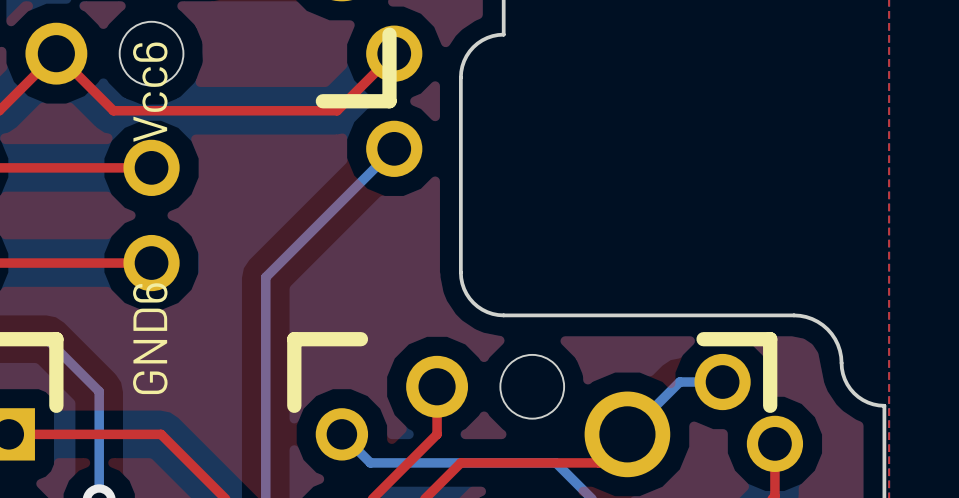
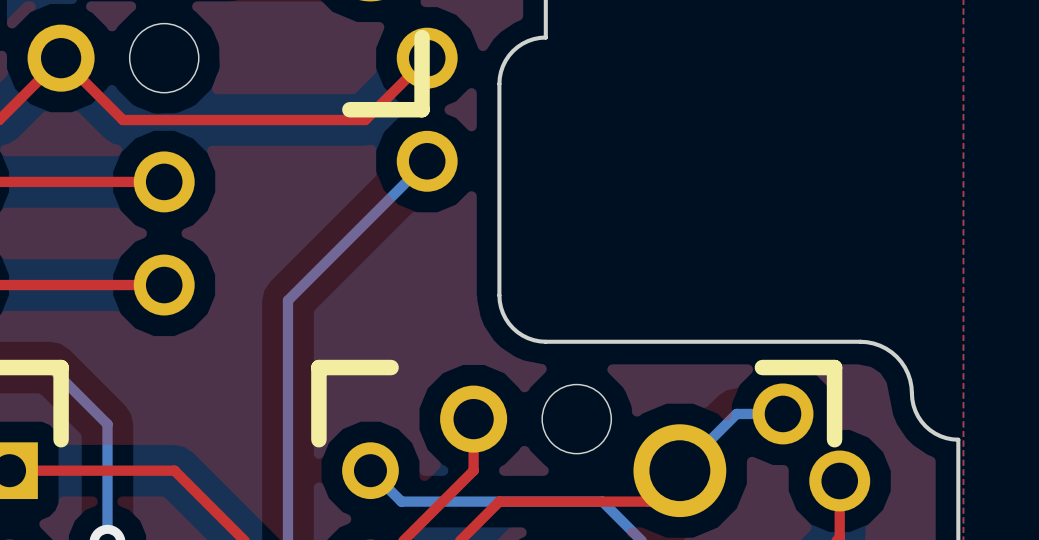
Vcc6 name: Vcc6 (150, 92) -> none
GND6 name: GND6 (150, 338) -> none

